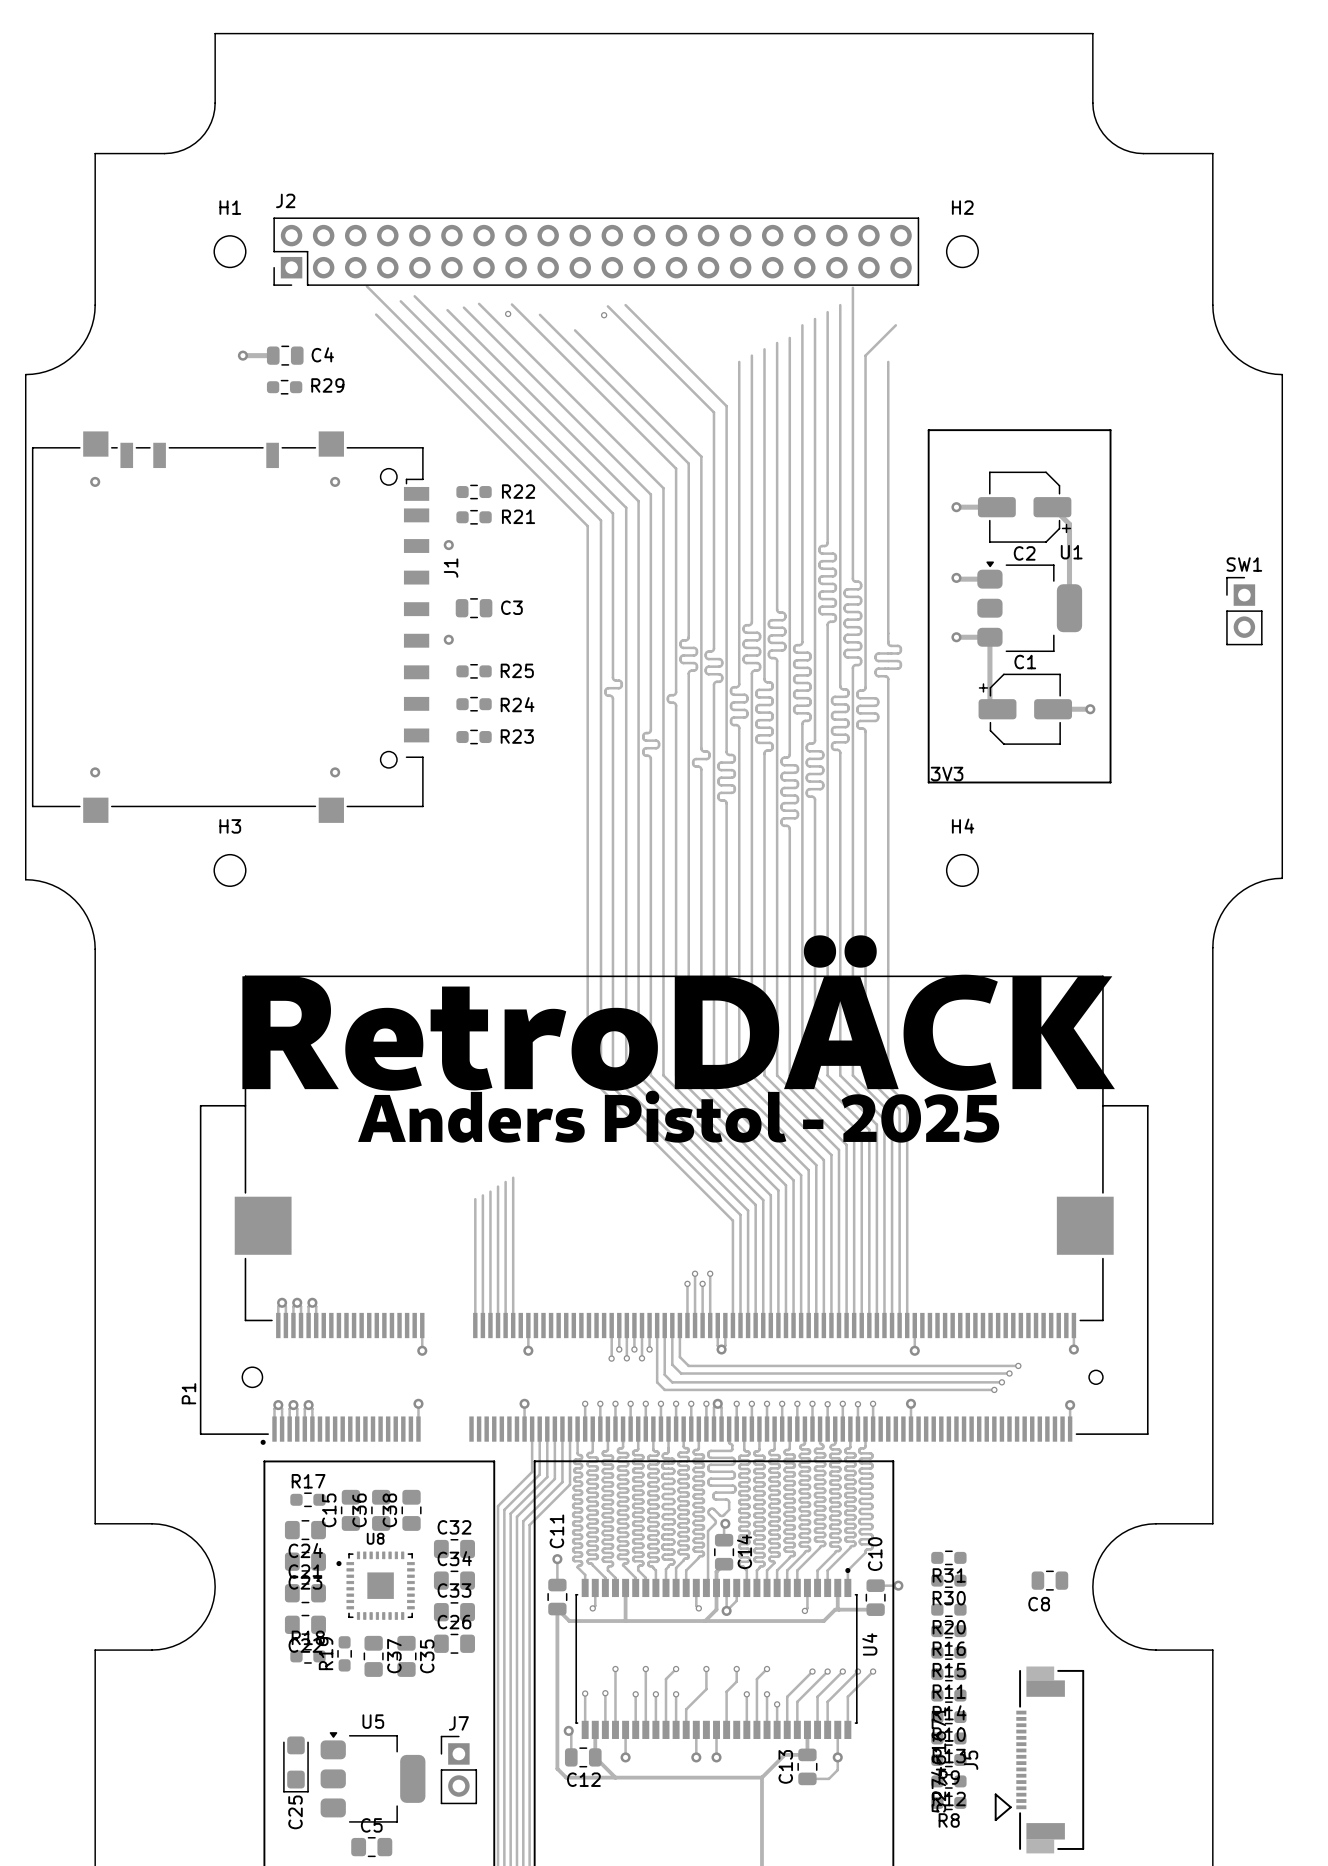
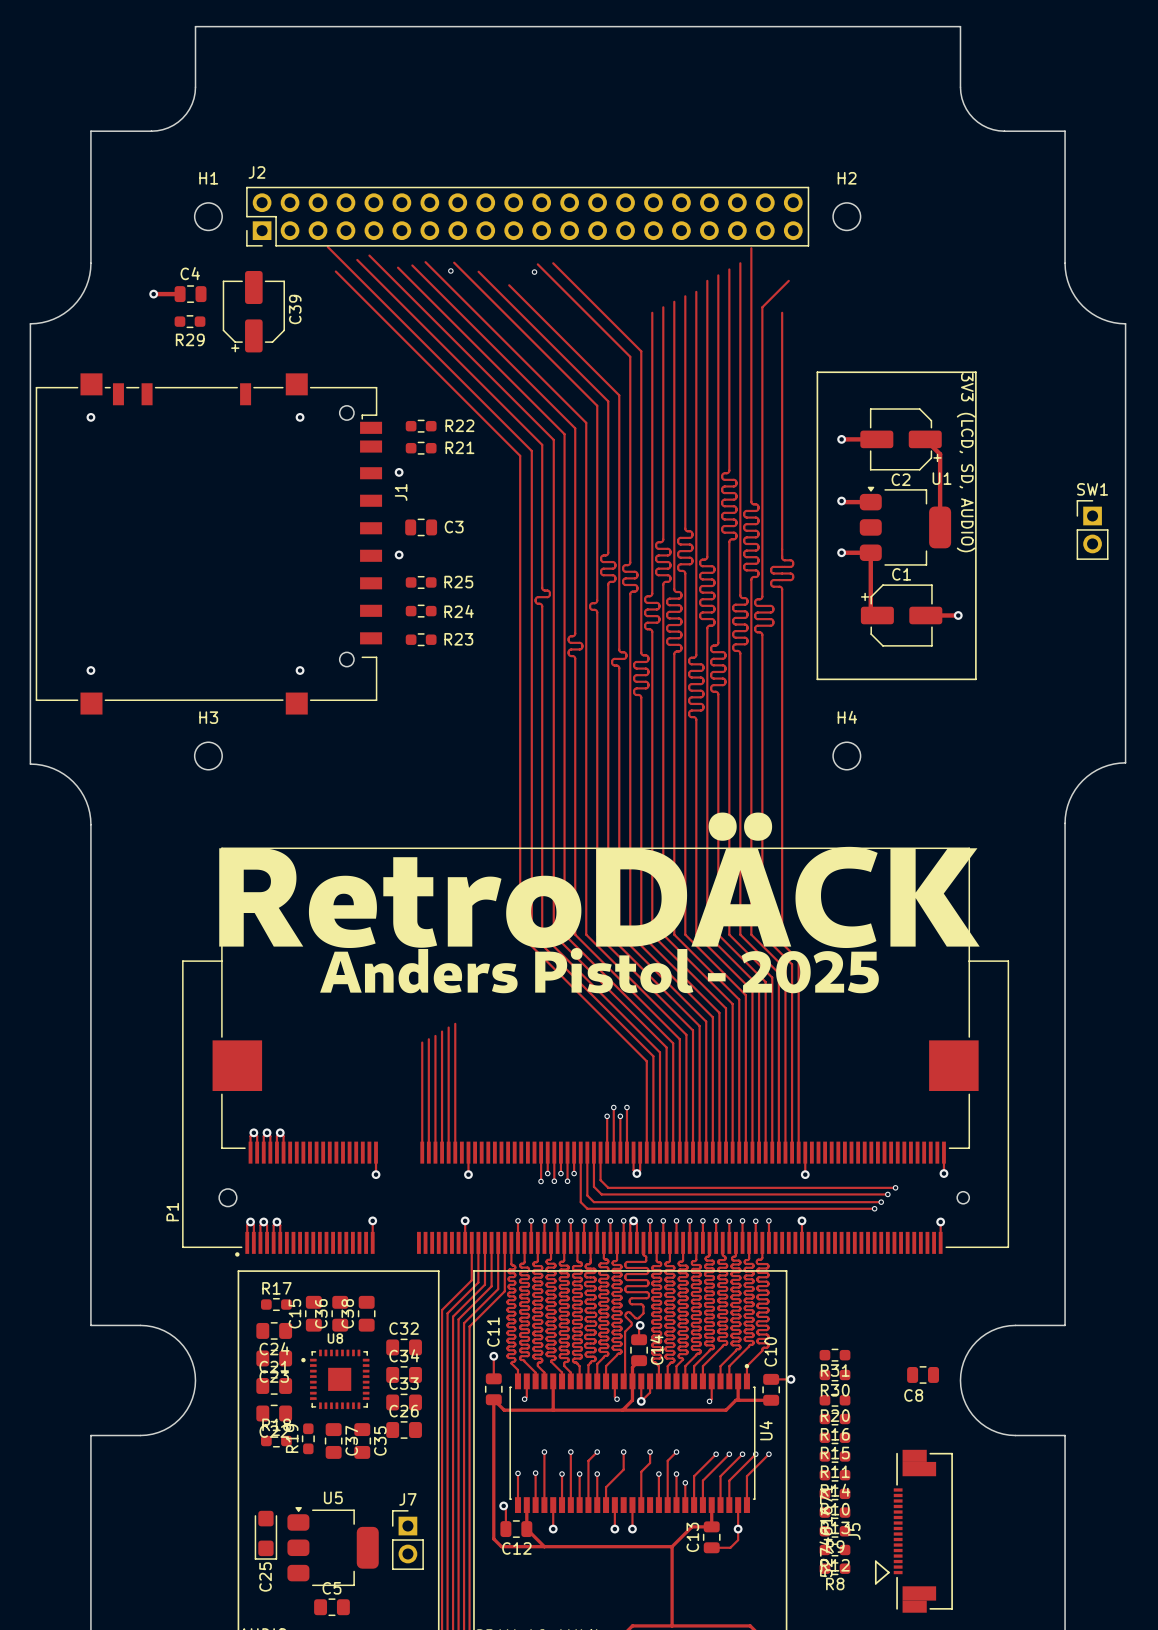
via: none -> (153, 294)
C4 name position: C4 (322, 354) -> C4 (190, 273)
track: (242, 355) (273, 355) -> (153, 294) (180, 294)
via: (242, 355) -> none
C4 position: (285, 355) -> (190, 294)
C39: none -> (253, 311)
R29 name position: R29 (327, 385) -> R29 (190, 339)
R29 position: (284, 387) -> (190, 321)
text: none -> 3V3 (LCD, SD, AUDIO) (966, 462)
text: 3V3 (947, 773) -> none

